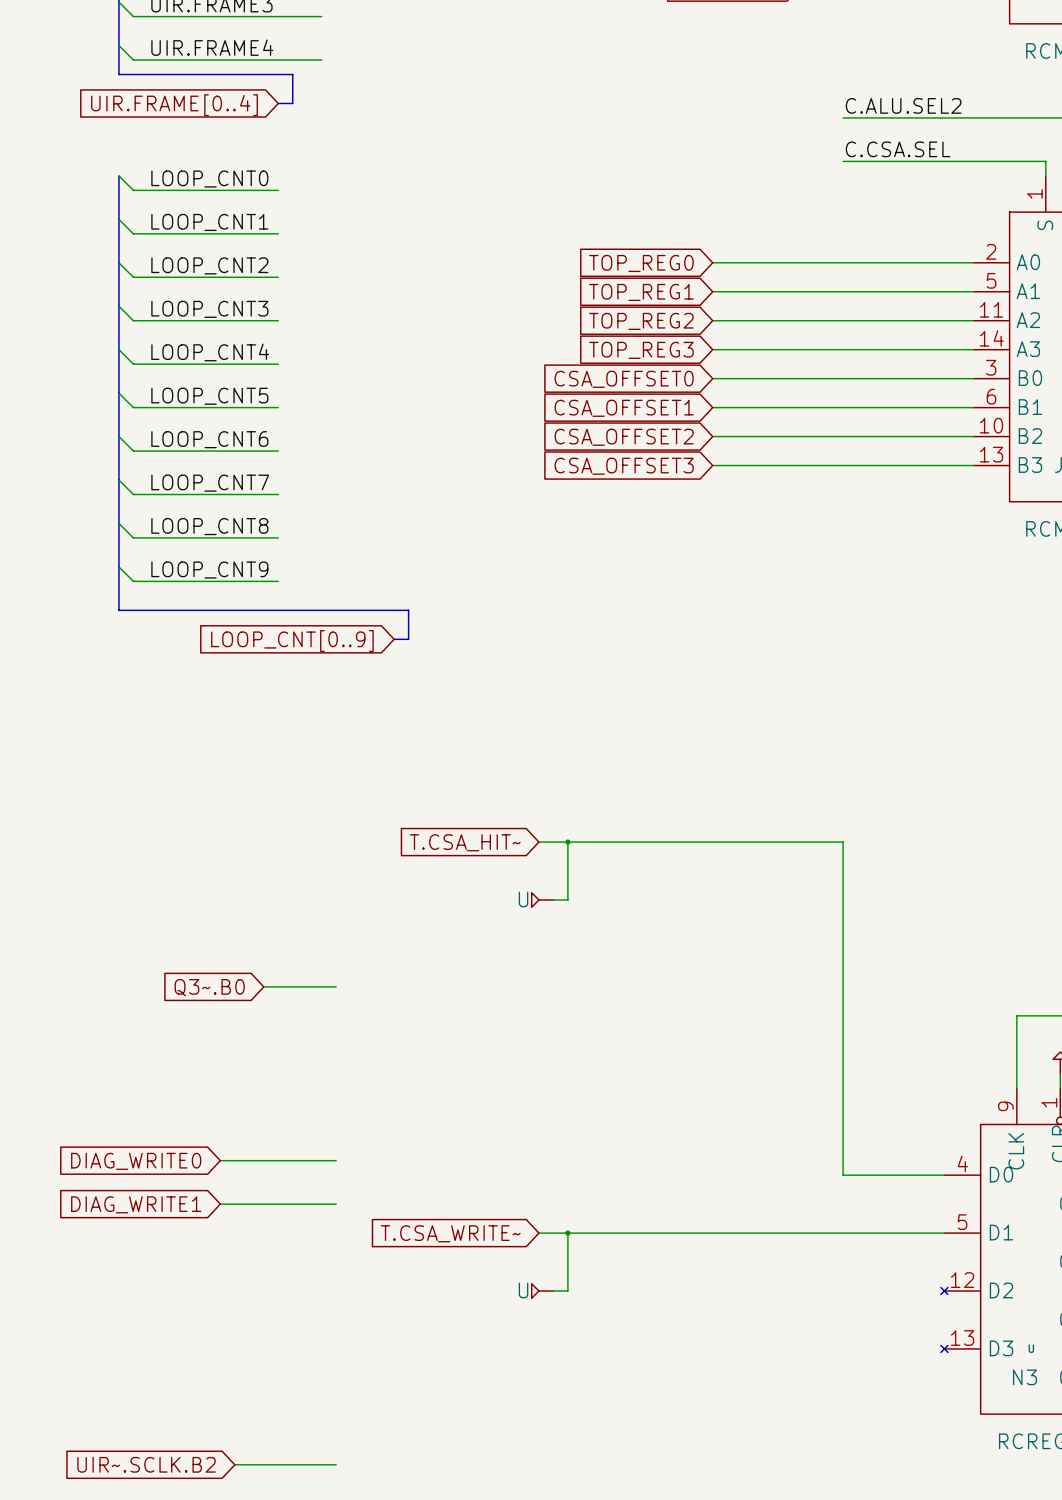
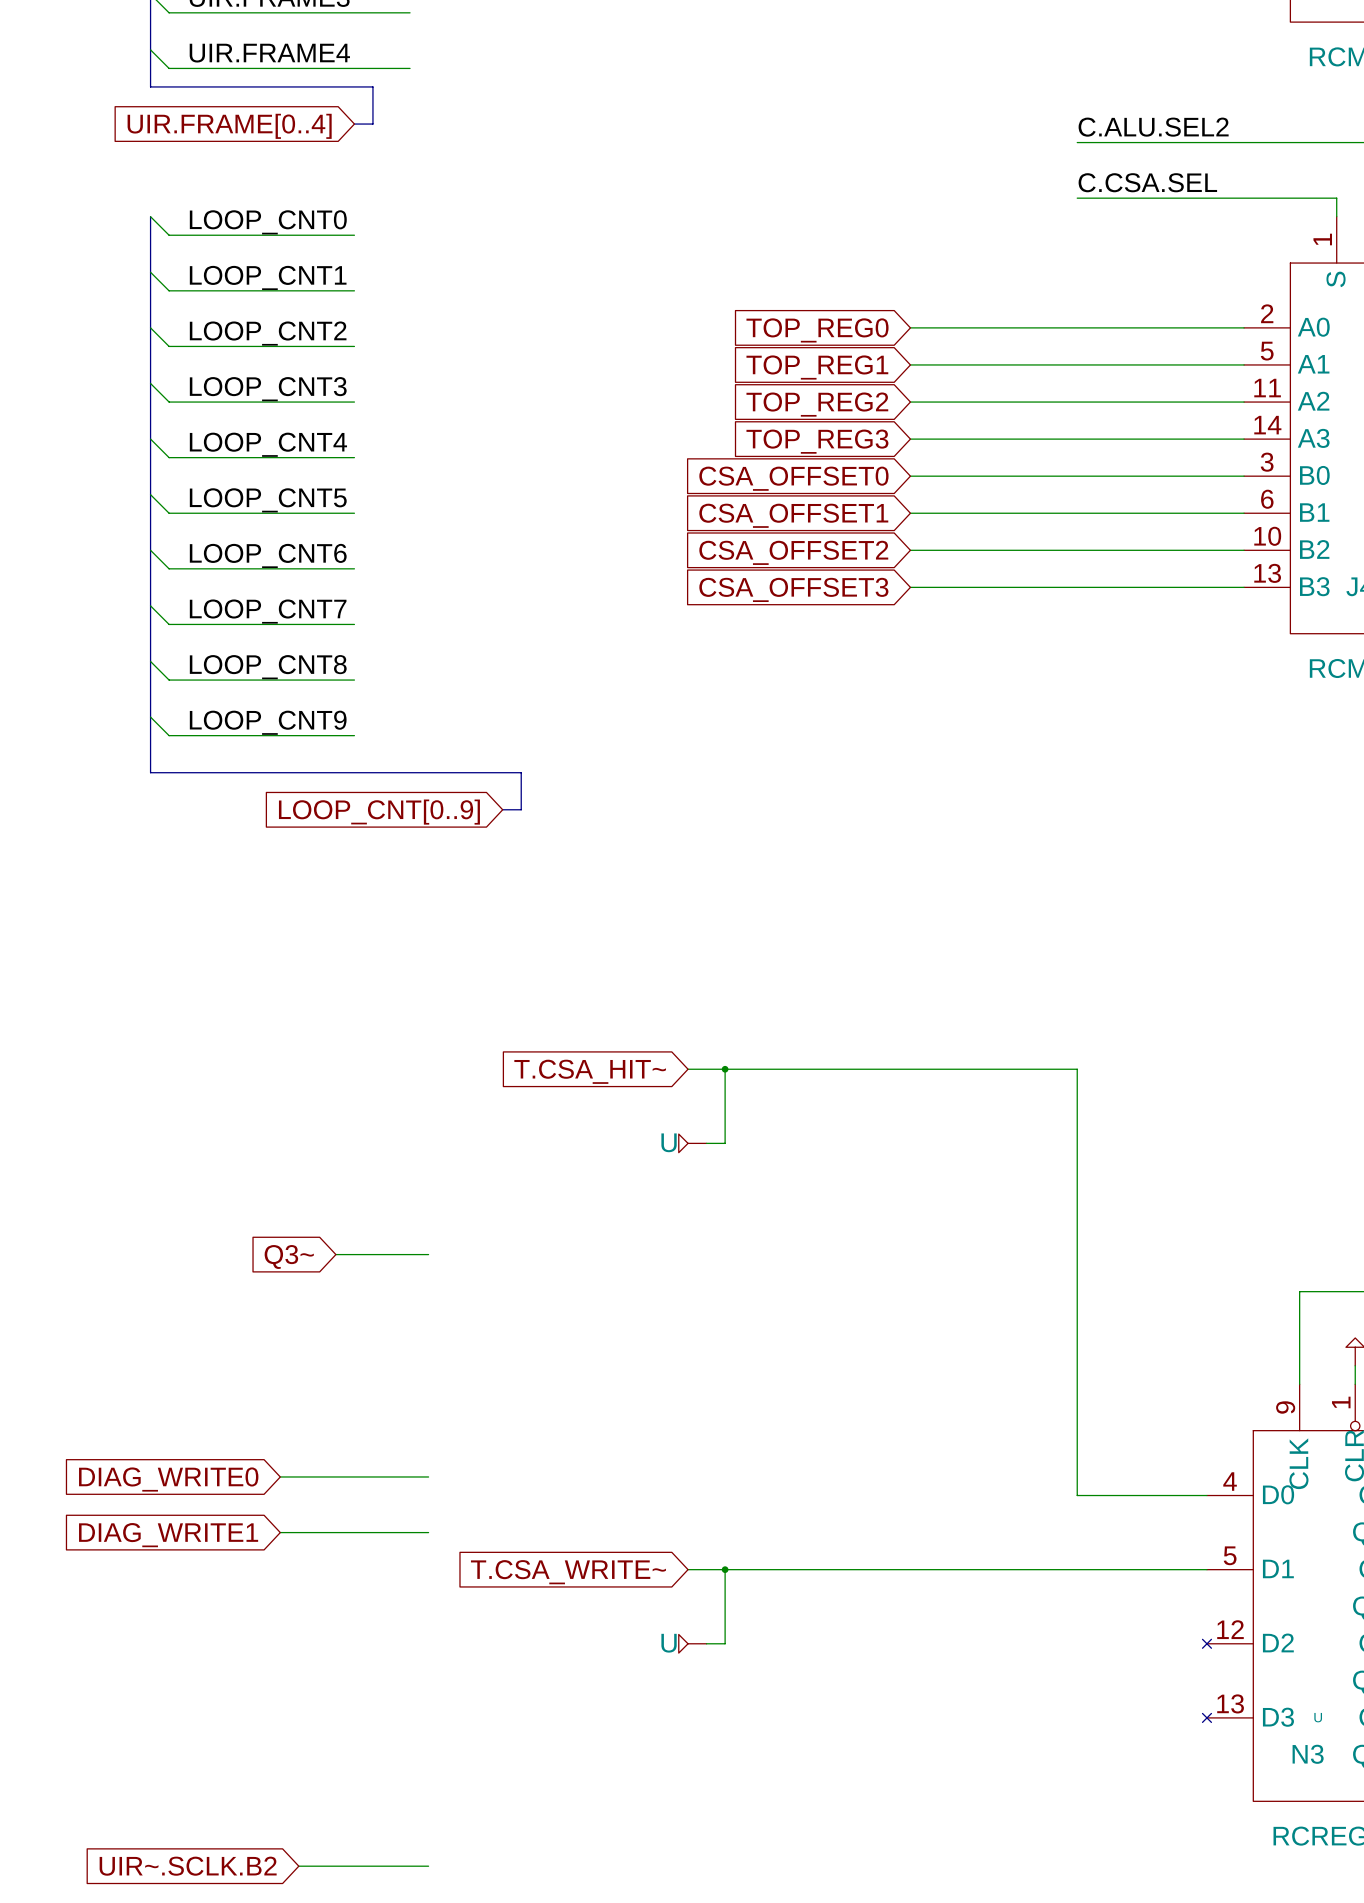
global label: Q3~.B0 (209, 987) -> Q3~ (289, 1256)

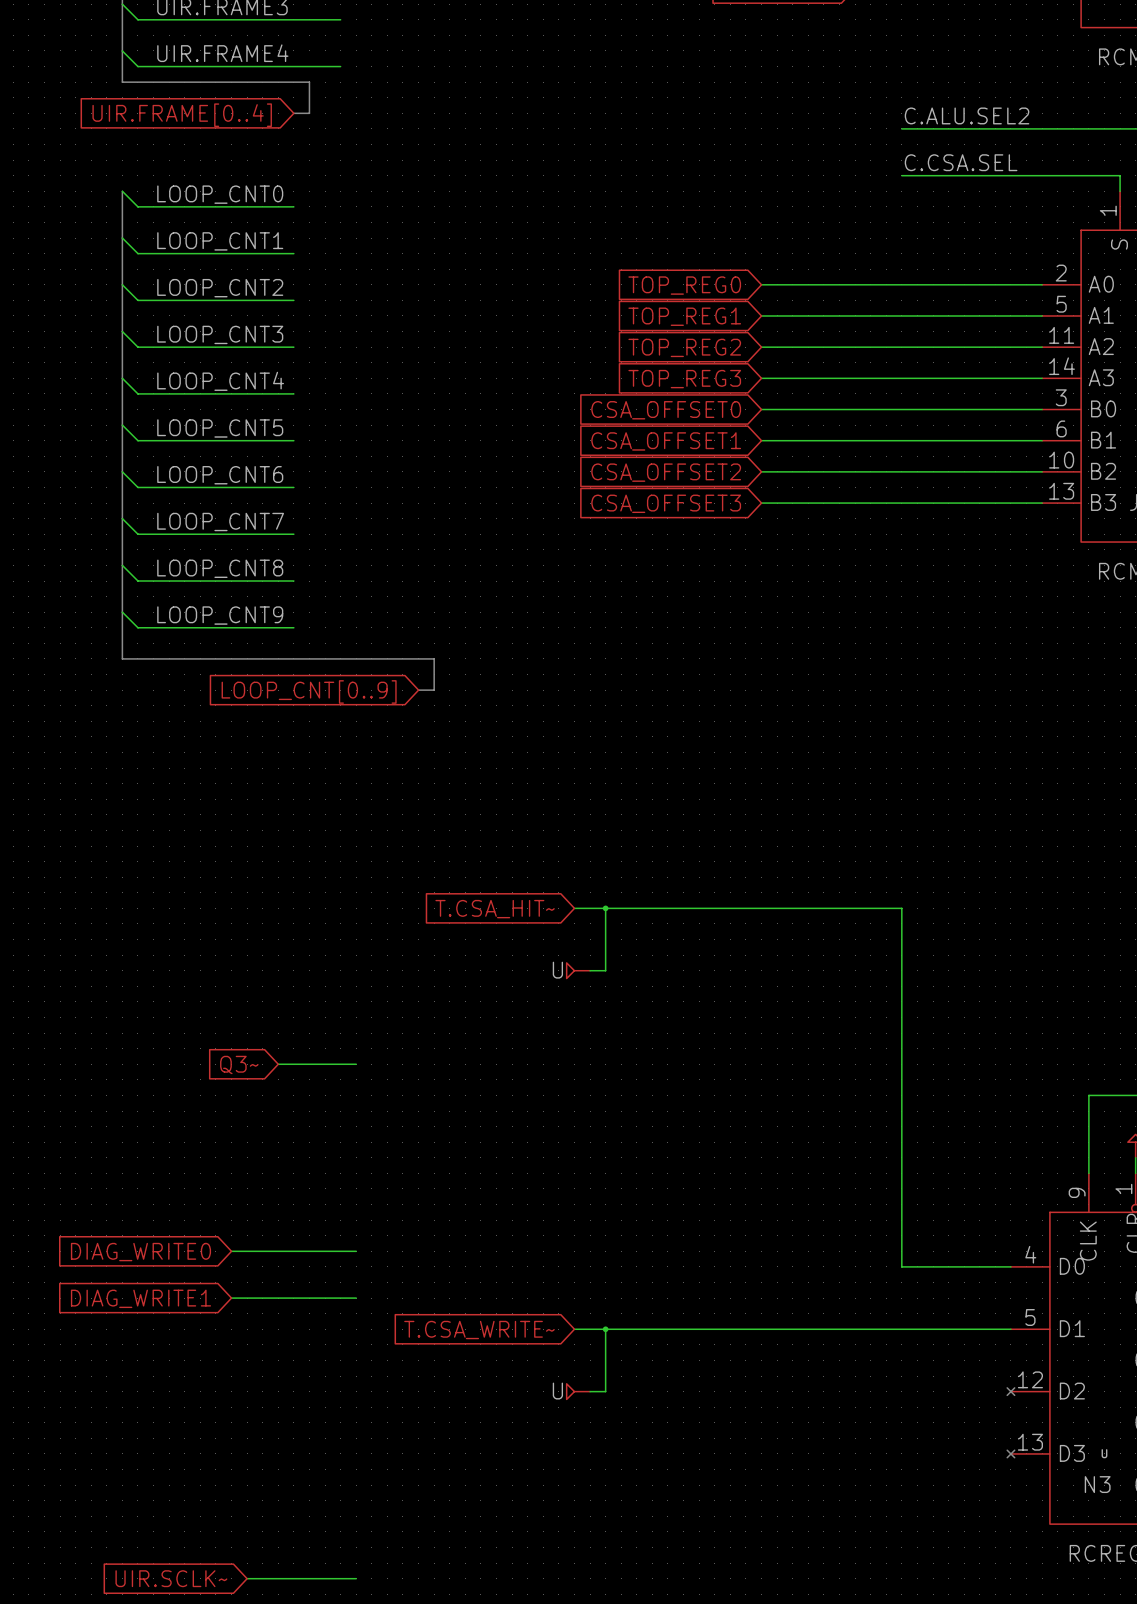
global label: UIR~.SCLK.B2 (188, 1866) -> UIR.SCLK~ (171, 1578)

